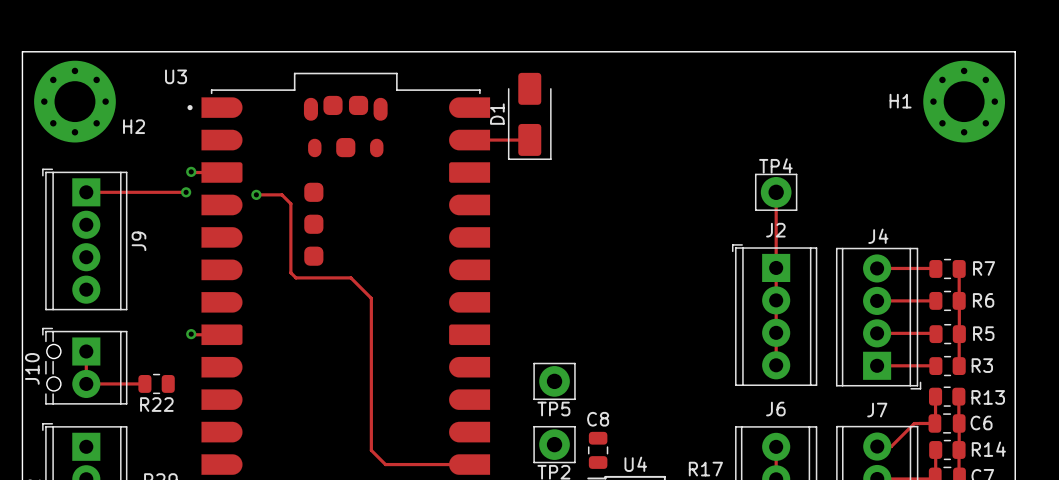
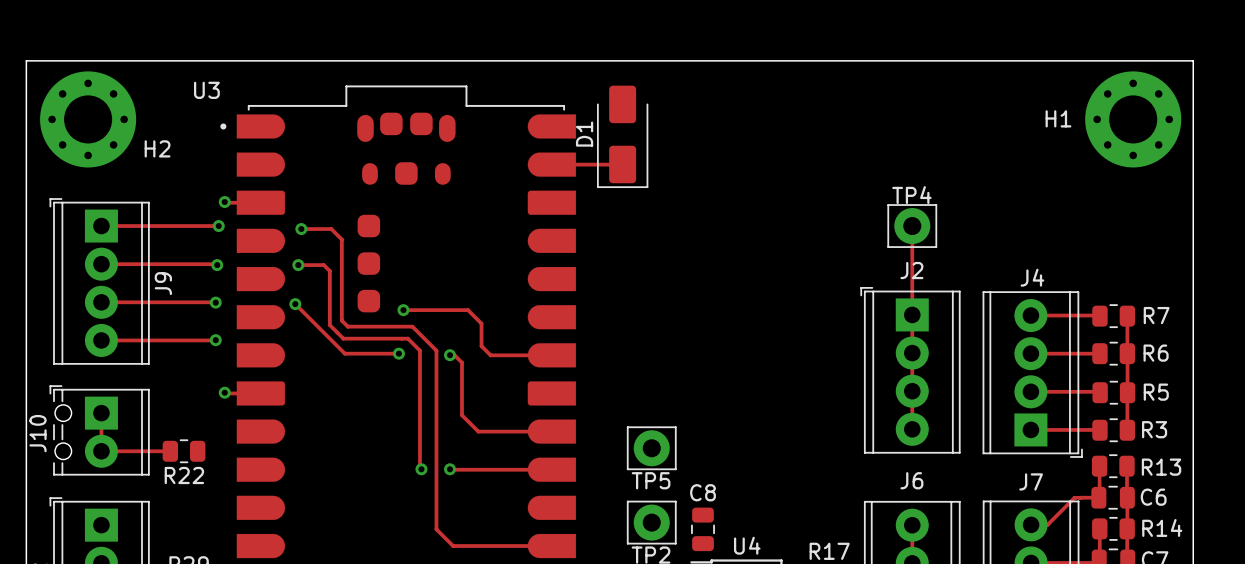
track: none -> (101, 264) (217, 265)
via: none -> (217, 265)
track: none -> (298, 265) (323, 265) (329, 271) (329, 325) (343, 338) (407, 338) (419, 350) (421, 469)
via: none -> (298, 265)
track: none -> (101, 302) (215, 302)
via: none -> (215, 302)
track: none -> (295, 304) (344, 353) (398, 353)
via: none -> (295, 304)
track: none -> (403, 310) (468, 310) (481, 323) (481, 346) (490, 355) (551, 355)
via: none -> (403, 310)
track: none -> (215, 340) (101, 340)
via: none -> (215, 340)
via: none -> (398, 353)
track: none -> (449, 355) (454, 355) (462, 362) (462, 415) (478, 431) (551, 431)
via: none -> (449, 355)
via: none -> (421, 469)
track: none -> (449, 469) (551, 469)
via: none -> (449, 469)

